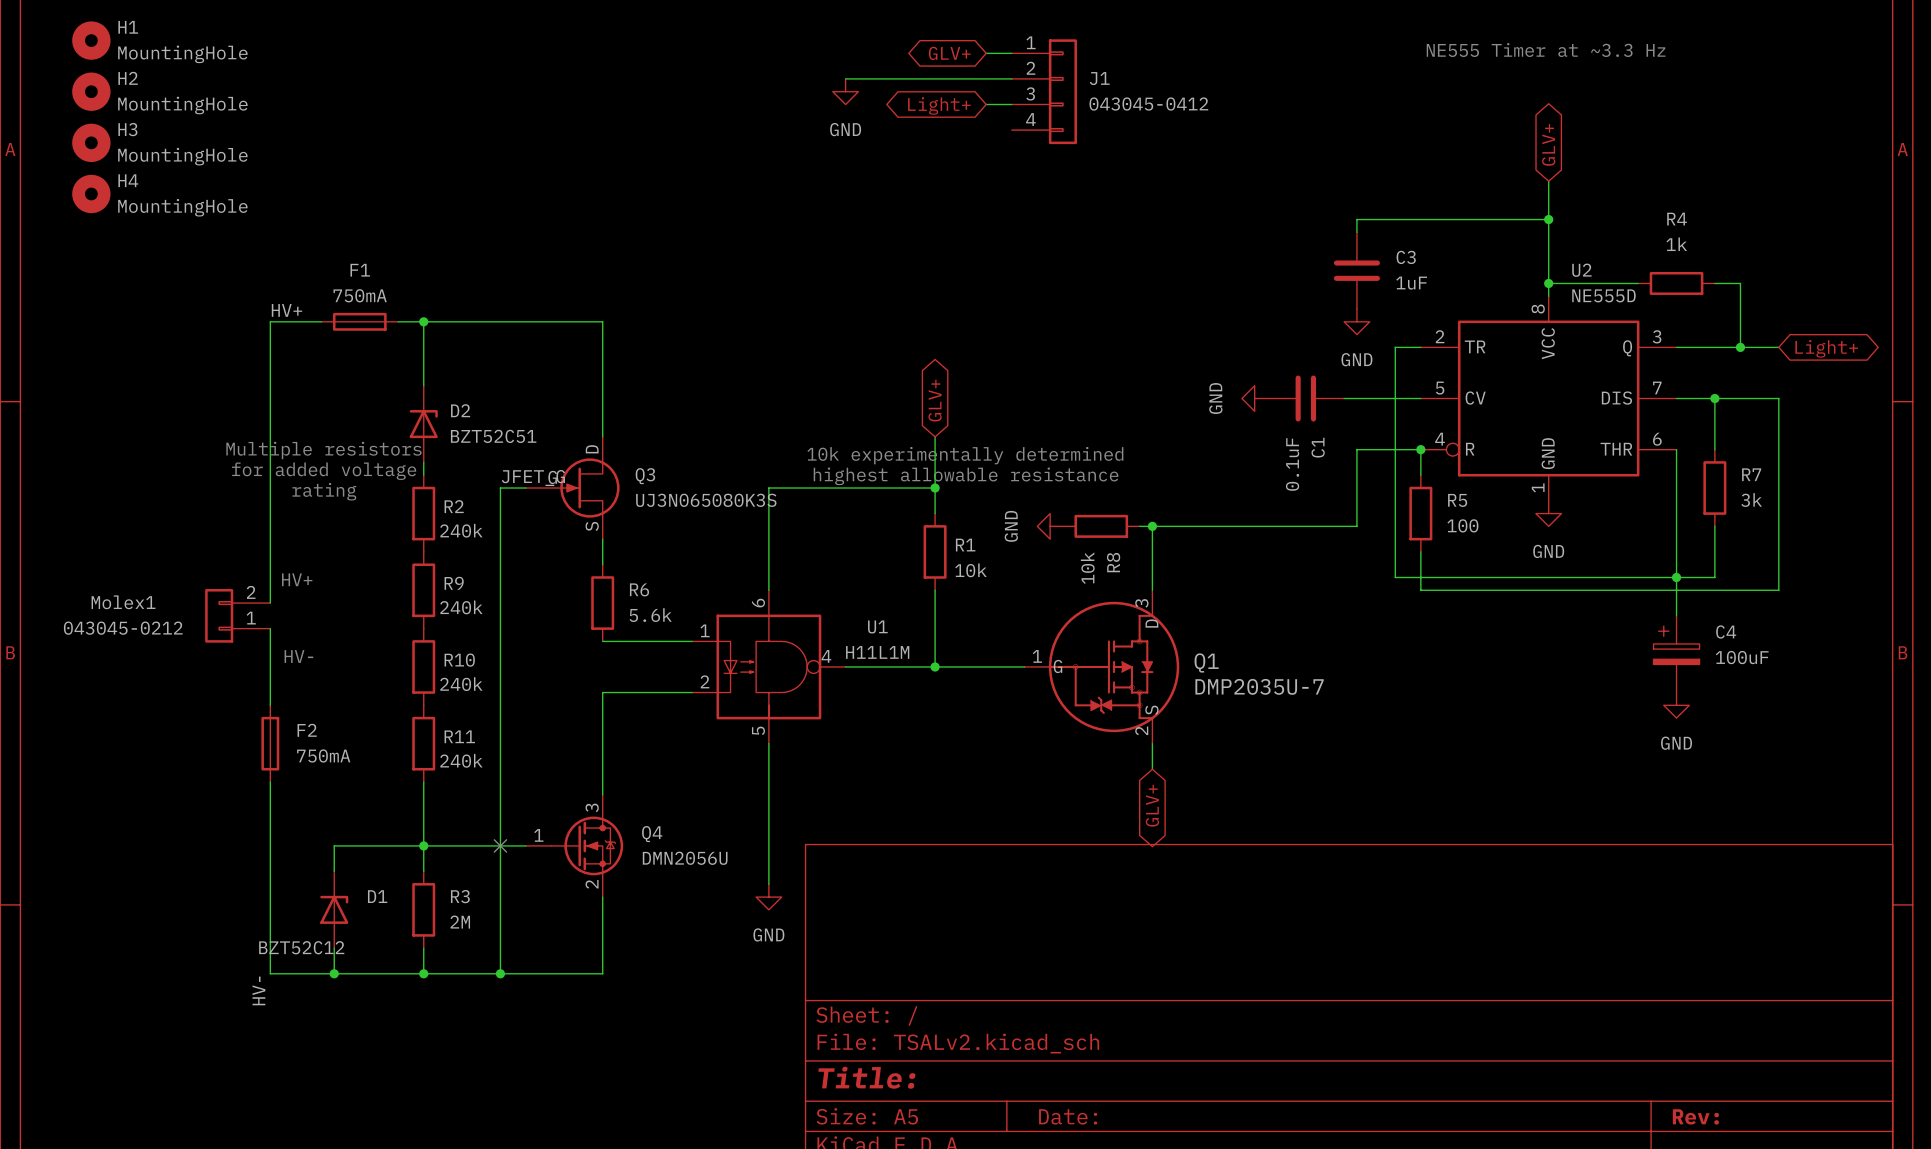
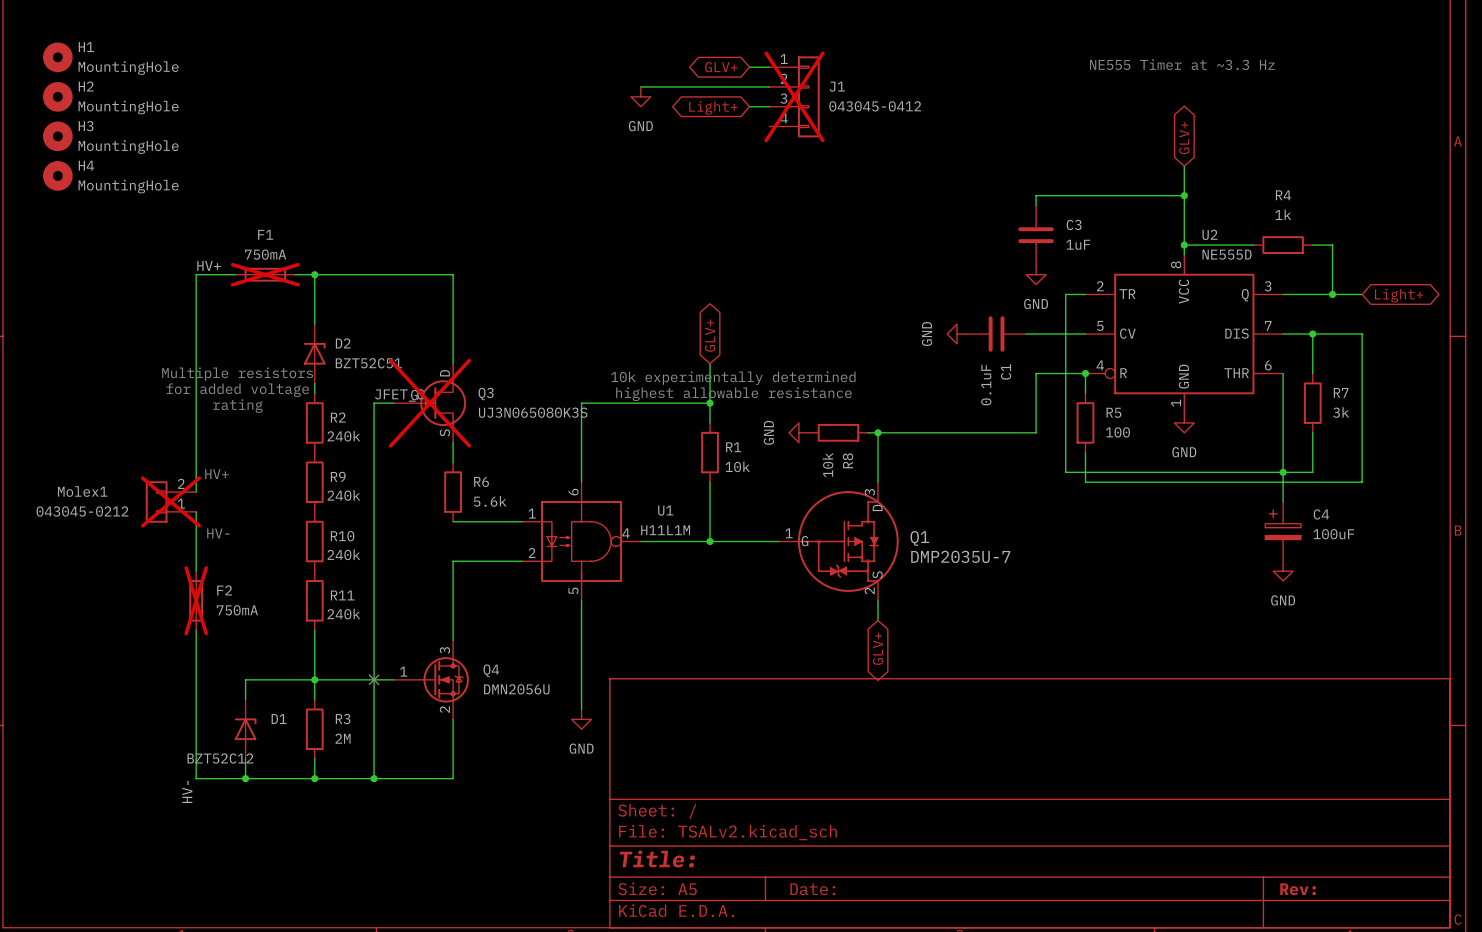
J1 do-not-place cross: none -> (794, 96)
F1 do-not-place cross: none -> (265, 274)
Q3 do-not-place cross: none -> (429, 403)
Molex1 do-not-place cross: none -> (170, 501)
F2 do-not-place cross: none -> (196, 600)

